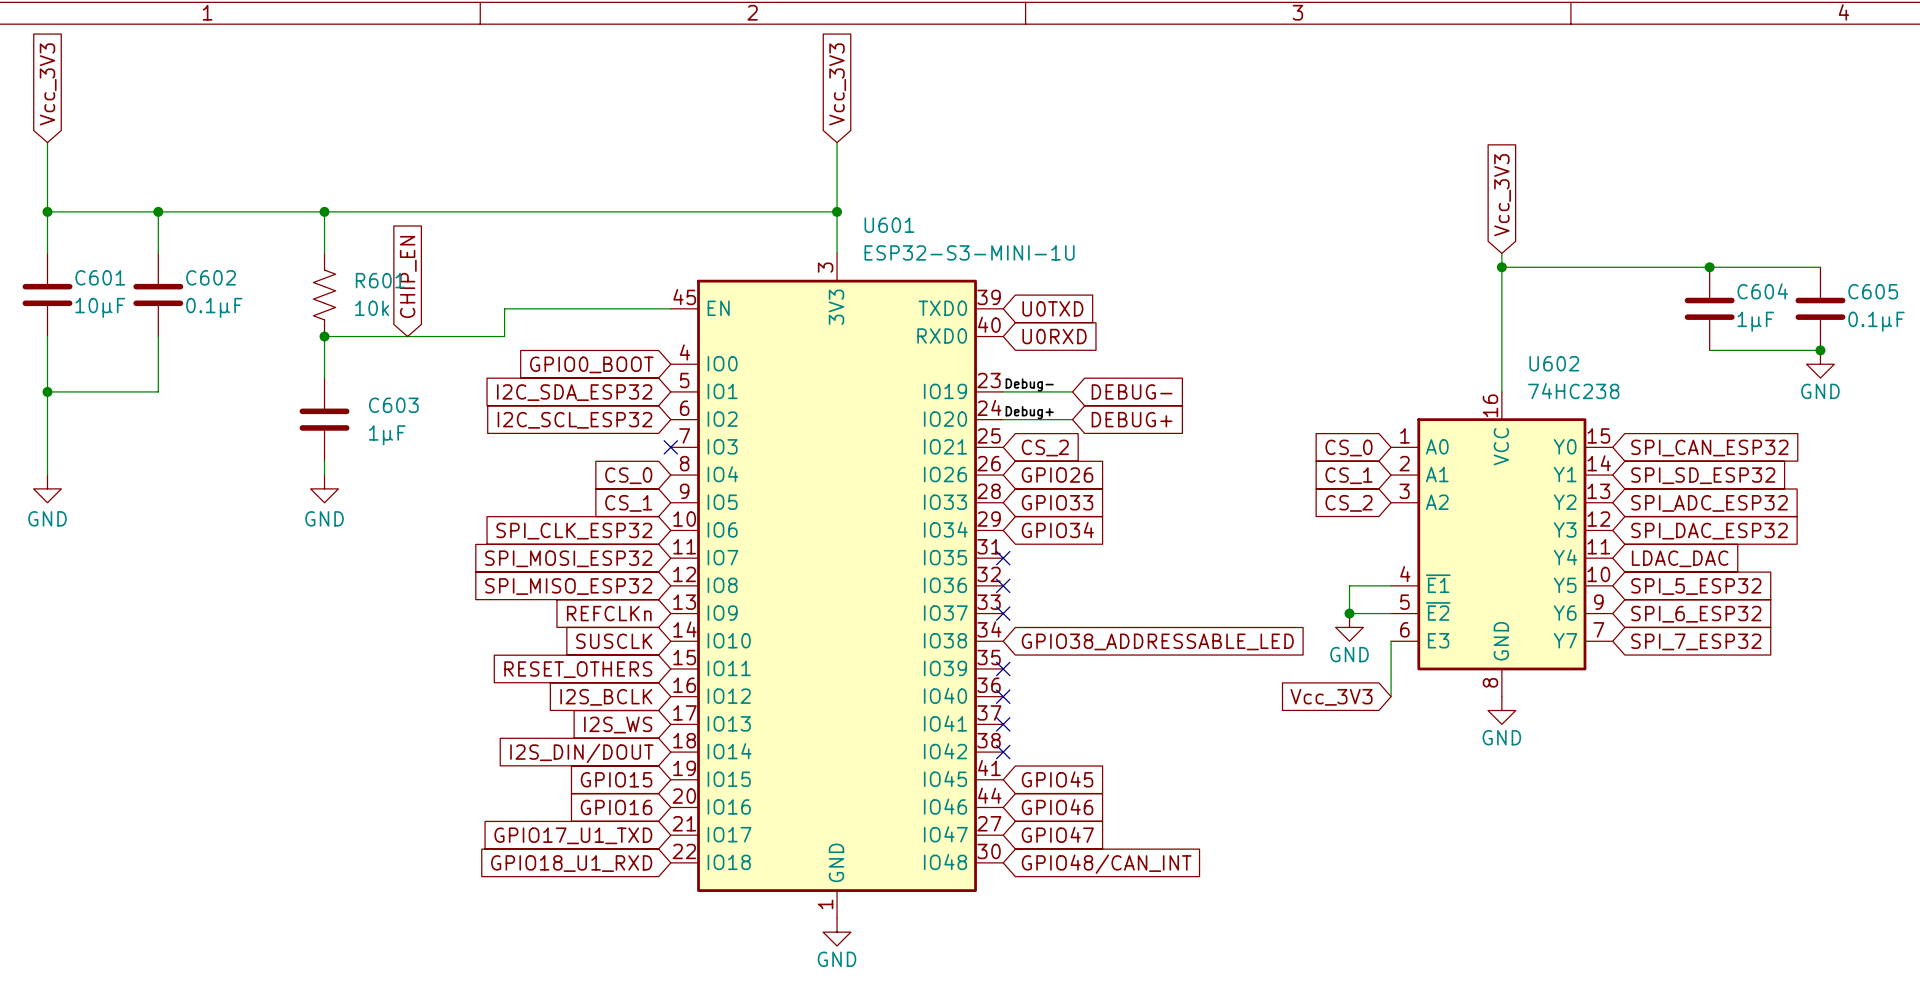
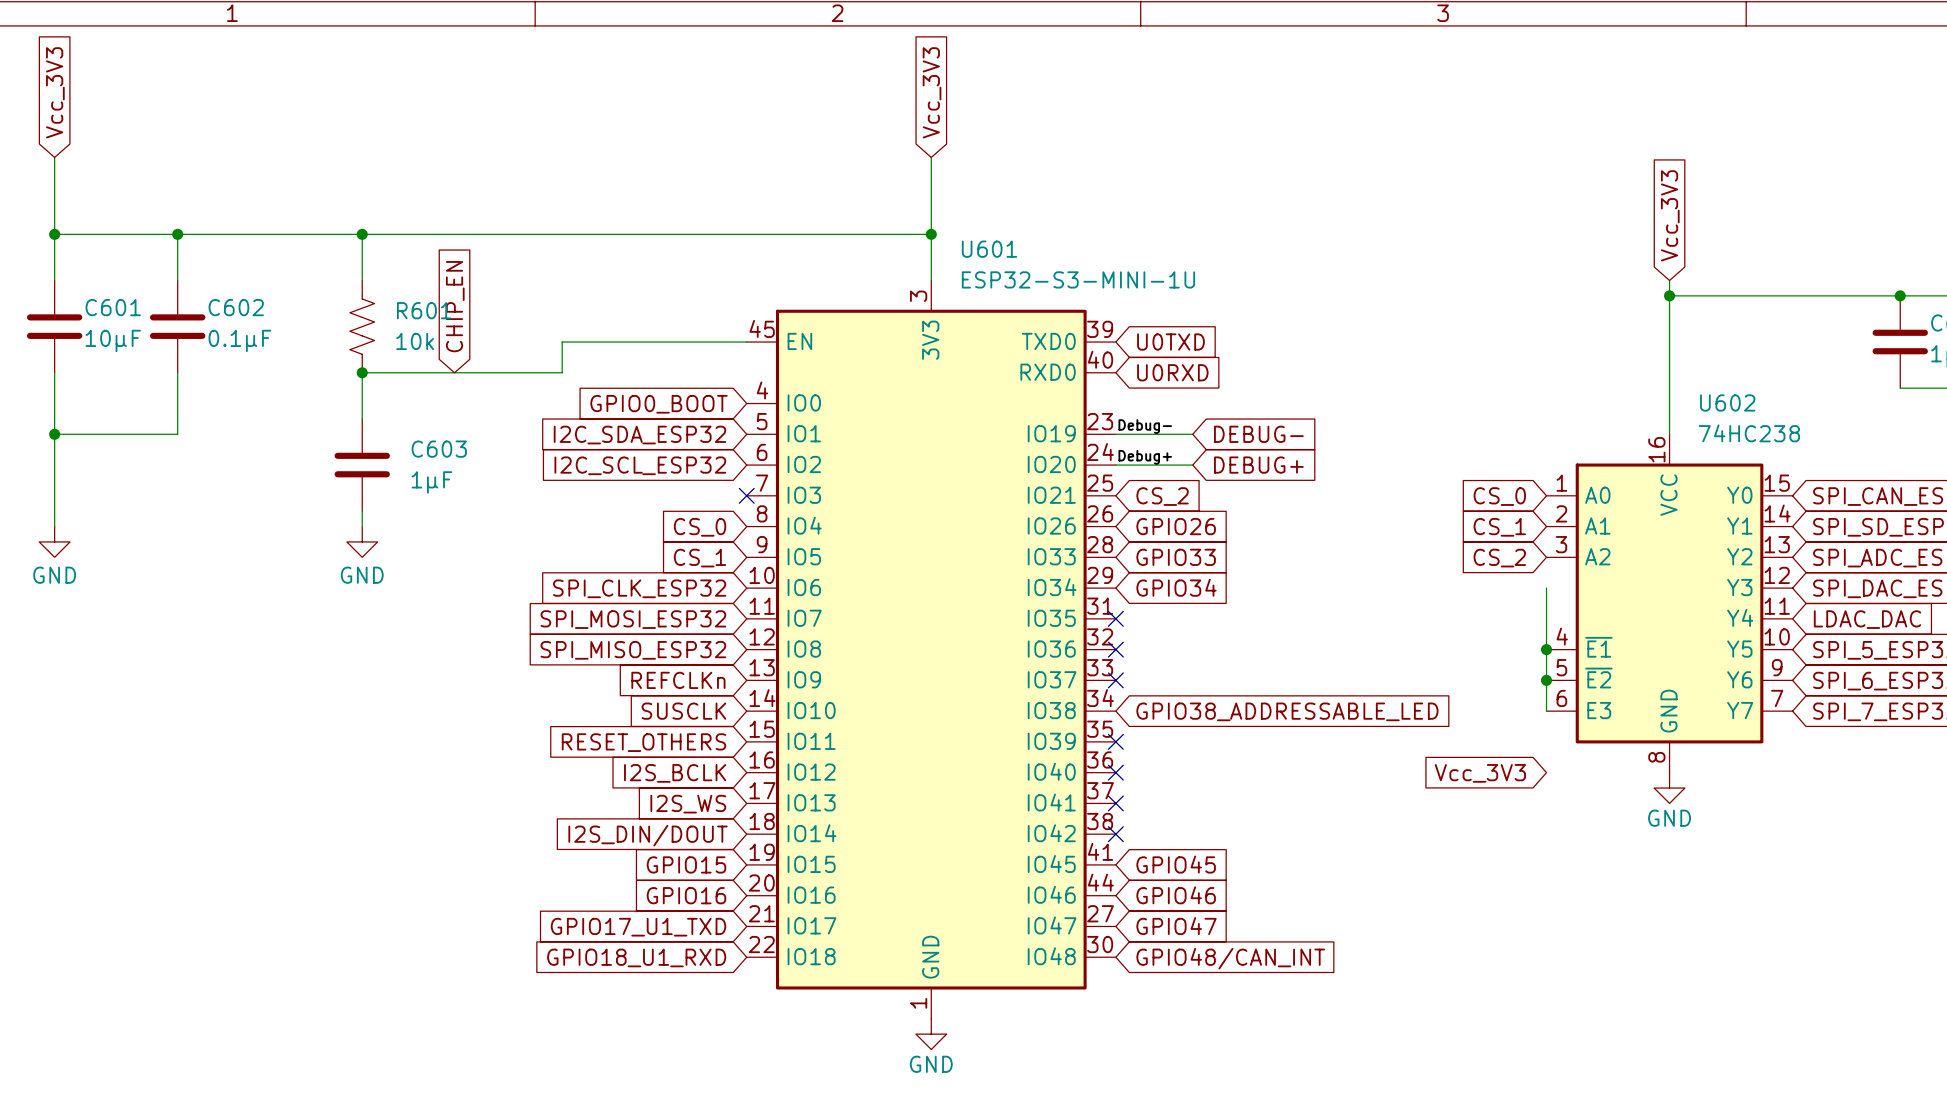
wire: (1391, 585) (1349, 585) (1349, 613) (1391, 613) -> none
junction: none -> (1546, 649)
junction: (1349, 613) -> none
junction: none -> (1546, 680)
power symbol: GND (1349, 627) -> none
wire: (1391, 641) (1391, 696) -> (1546, 711) (1546, 588)

